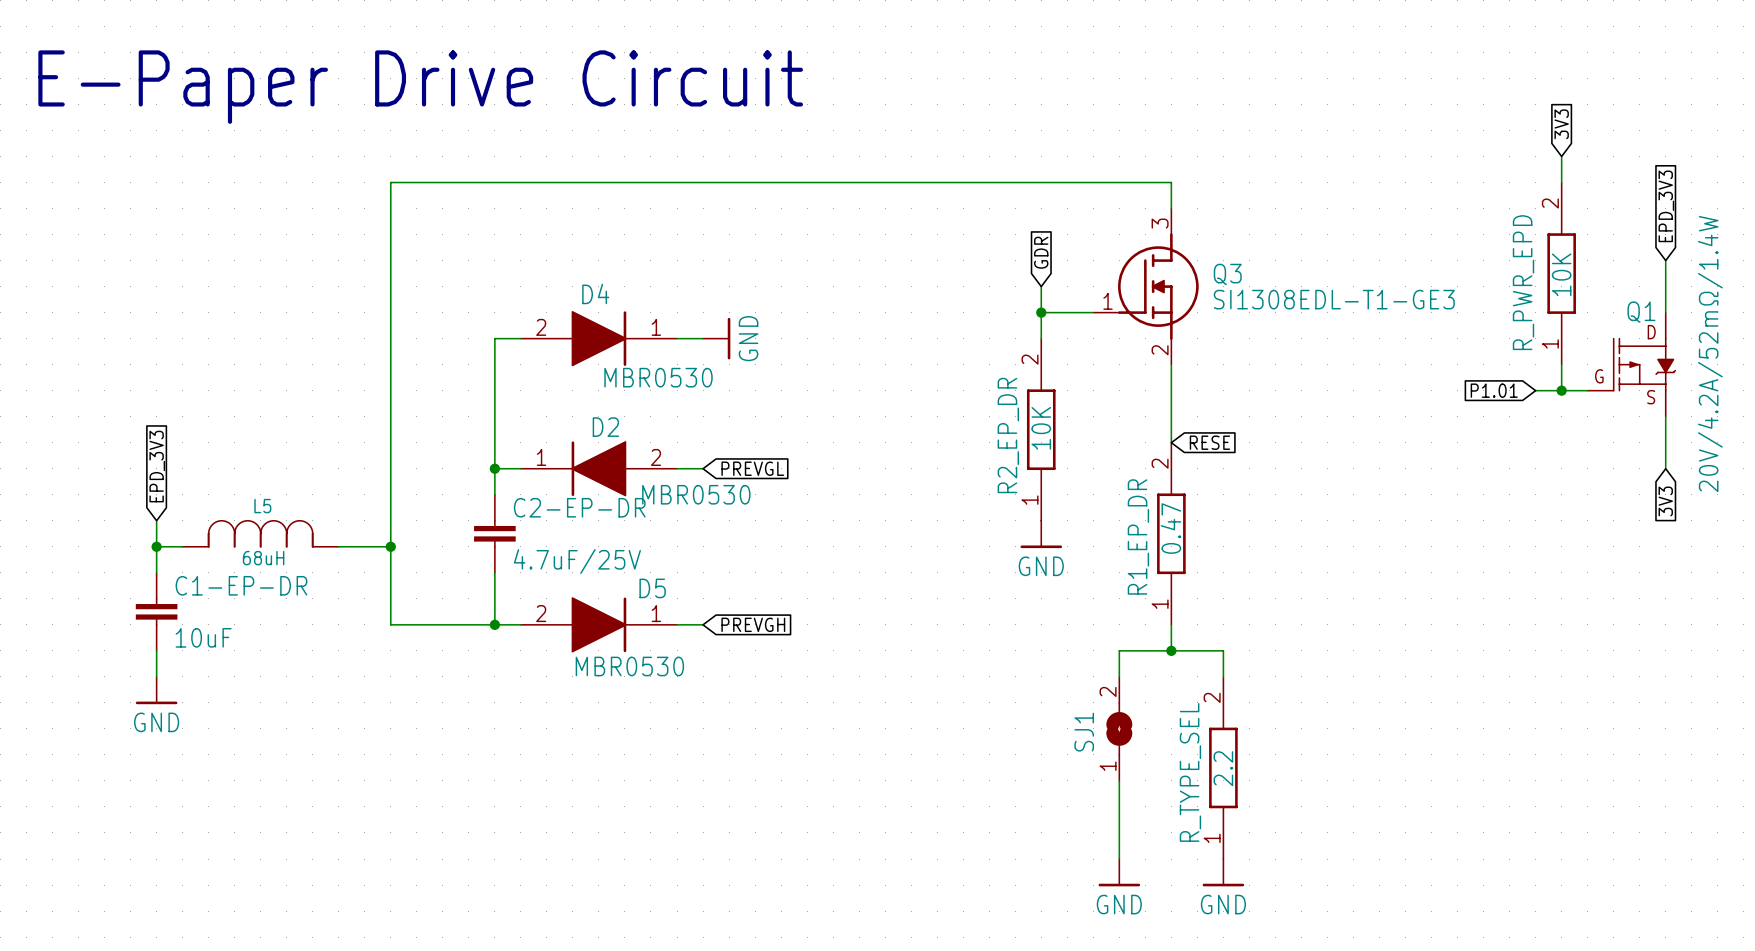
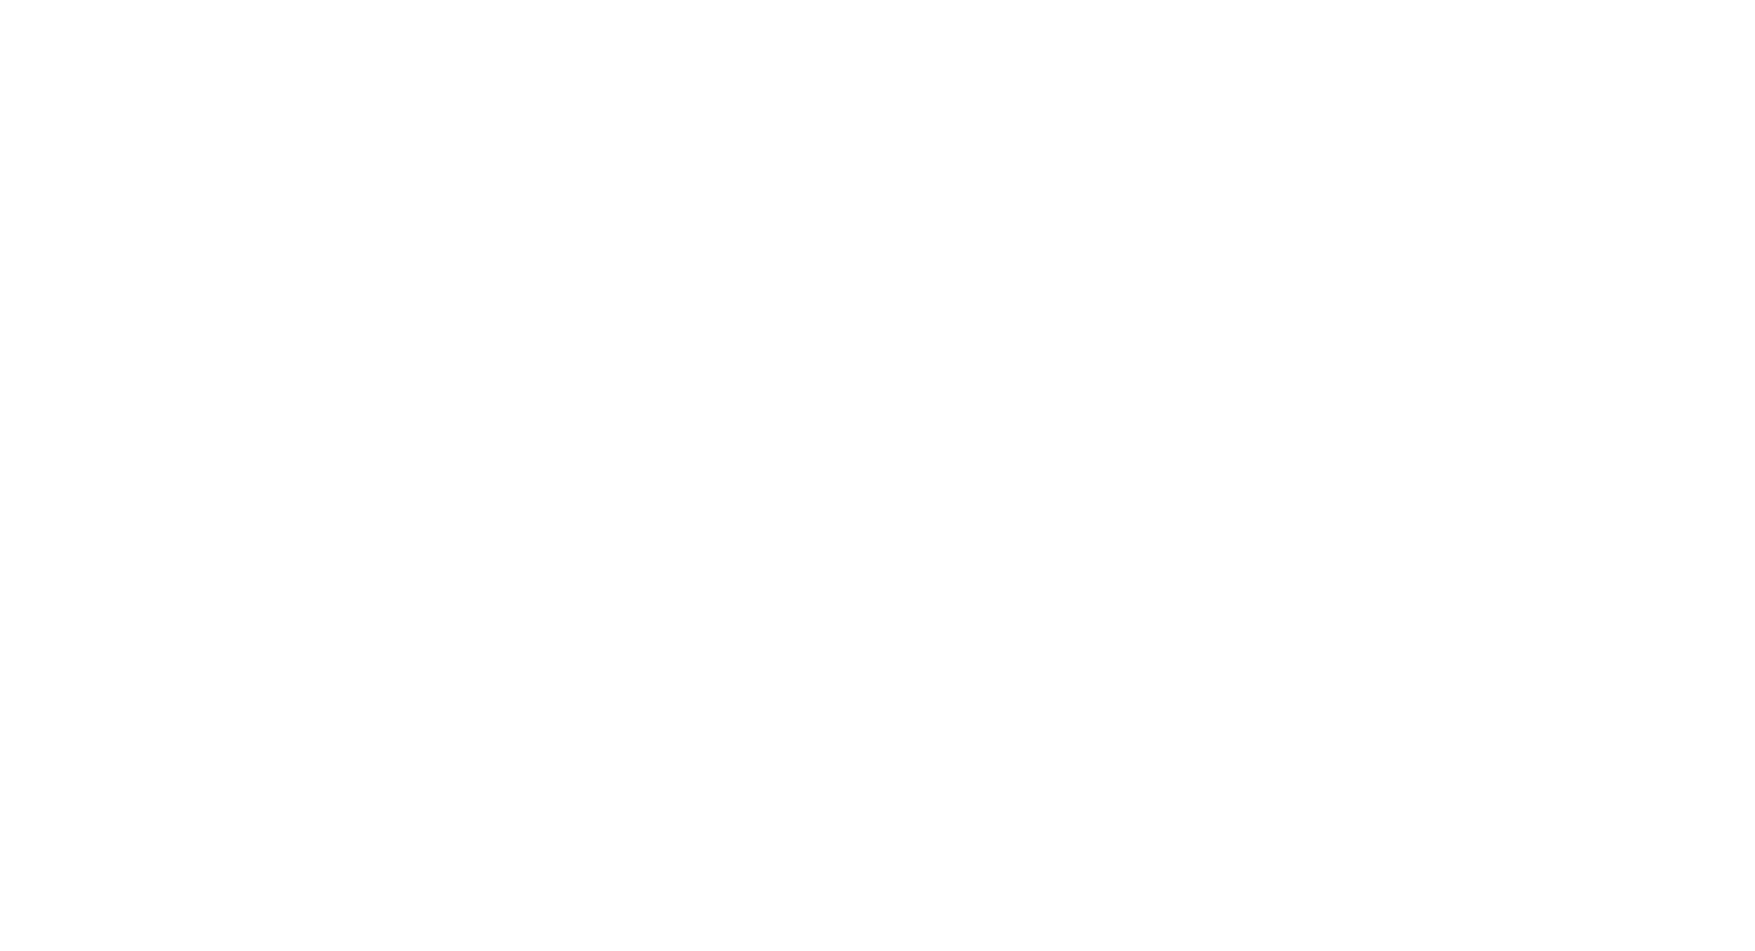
text: E-Paper Drive Circuit (420, 87) -> none
global label: 3V3 (1561, 124) -> none
wire: (1561, 156) (1561, 182) -> none
global label: EPD_3V3 (1666, 206) -> none
wire: (1171, 208) (1171, 182) (390, 182) (390, 624) (520, 624) -> none
global label: GDR (1041, 252) -> none
wire: (1665, 260) (1665, 312) -> none
R_PWR_EPD: 10K (1561, 273) -> none
wire: (1041, 286) (1041, 338) -> none
Q3: SI1308EDL-T1-GE3 (1146, 286) -> none
wire: (1041, 312) (1093, 312) -> none
junction: (1041, 312) -> none
wire: (520, 338) (494, 338) (494, 494) -> none
D4: MBR0530 (598, 338) -> none
wire: (677, 338) (703, 338) -> none
power symbol: GND (716, 338) -> none
wire: (1171, 364) (1171, 442) -> none
wire: (1561, 364) (1561, 390) -> none
Q1: 20V/4.2A/52mΩ/1.4W (1631, 364) -> none
global label: P1.01 (1494, 390) -> none
wire: (1535, 390) (1587, 390) -> none
junction: (1561, 390) -> none
wire: (1665, 416) (1665, 468) -> none
R2_EP_DR: 10K (1041, 429) -> none
global label: RESE (1209, 442) -> none
global label: EPD_3V3 (157, 466) -> none
wire: (494, 468) (520, 468) -> none
junction: (494, 468) -> none
D2: MBR0530 (598, 468) -> none
wire: (677, 468) (703, 468) -> none
global label: PREVGL (752, 468) -> none
global label: 3V3 (1665, 501) -> none
wire: (156, 520) (156, 572) -> none
L5: 68uH (260, 533) -> none
C2-EP-DR: 4.7uF/25V (494, 533) -> none
R1_EP_DR: 0.47 (1171, 533) -> none
power symbol: GND (1041, 534) -> none
wire: (156, 546) (182, 546) -> none
junction: (156, 546) -> none
wire: (338, 546) (390, 546) -> none
junction: (390, 546) -> none
wire: (494, 572) (494, 624) -> none
C1-EP-DR: 10uF (156, 611) -> none
junction: (494, 624) -> none
D5: MBR0530 (598, 624) -> none
wire: (677, 624) (703, 624) -> none
global label: PREVGH (753, 624) -> none
wire: (1171, 624) (1171, 650) -> none
wire: (156, 650) (156, 676) -> none
junction: (1171, 650) -> none
wire: (1119, 676) (1119, 650) (1223, 650) (1223, 676) -> none
power symbol: GND (156, 690) -> none
SJ1: (1119, 728) -> none
R_TYPE_SEL: 2.2 (1223, 767) -> none
wire: (1119, 780) (1119, 859) -> none
power symbol: GND (1119, 872) -> none
power symbol: GND (1223, 872) -> none

